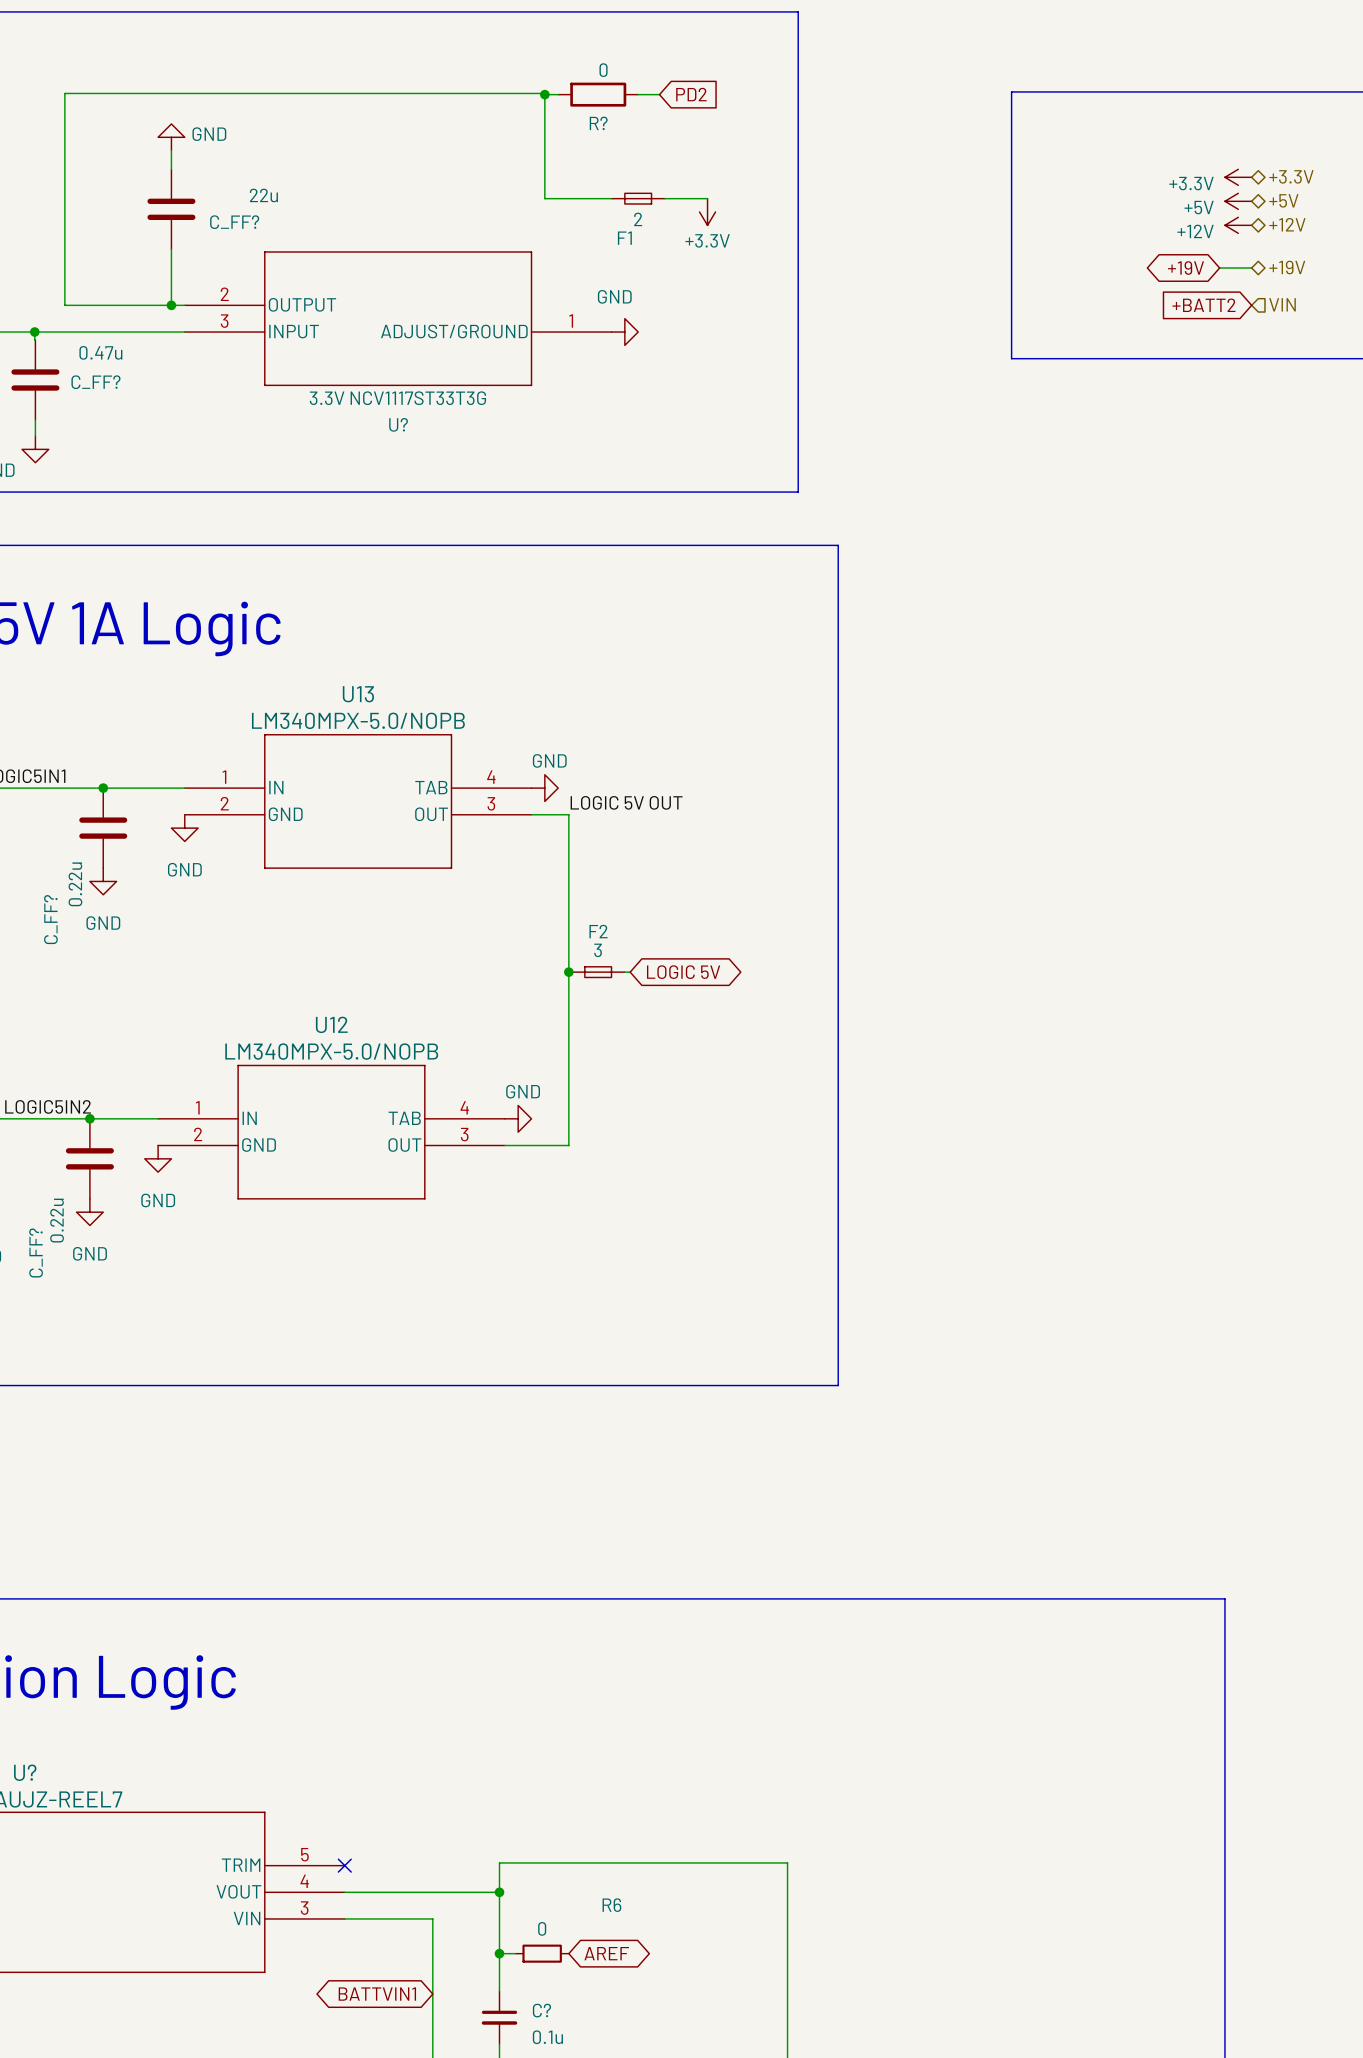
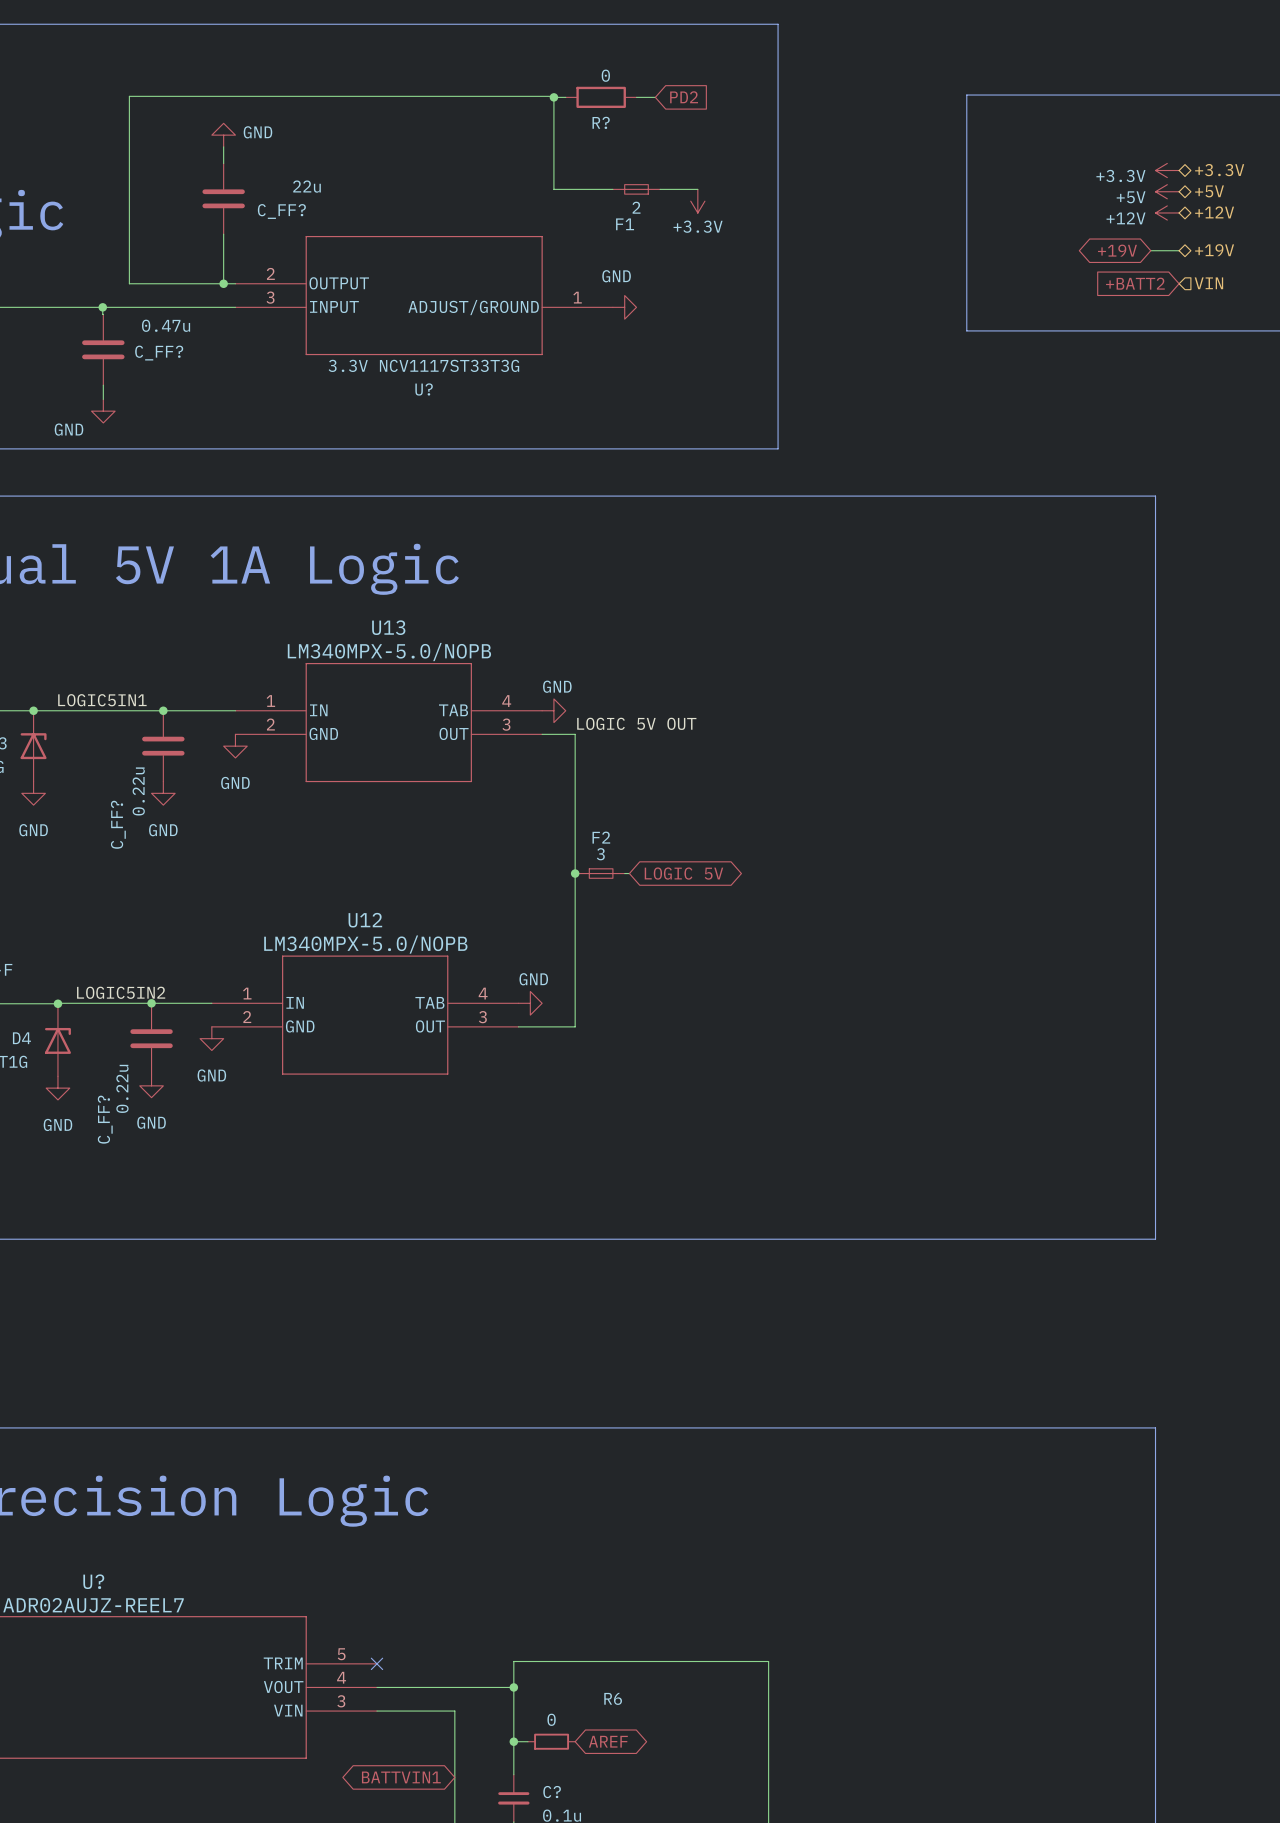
line: (838, 545) (838, 1385) -> (813, 496) (1155, 496) (1155, 1239) (813, 1239)

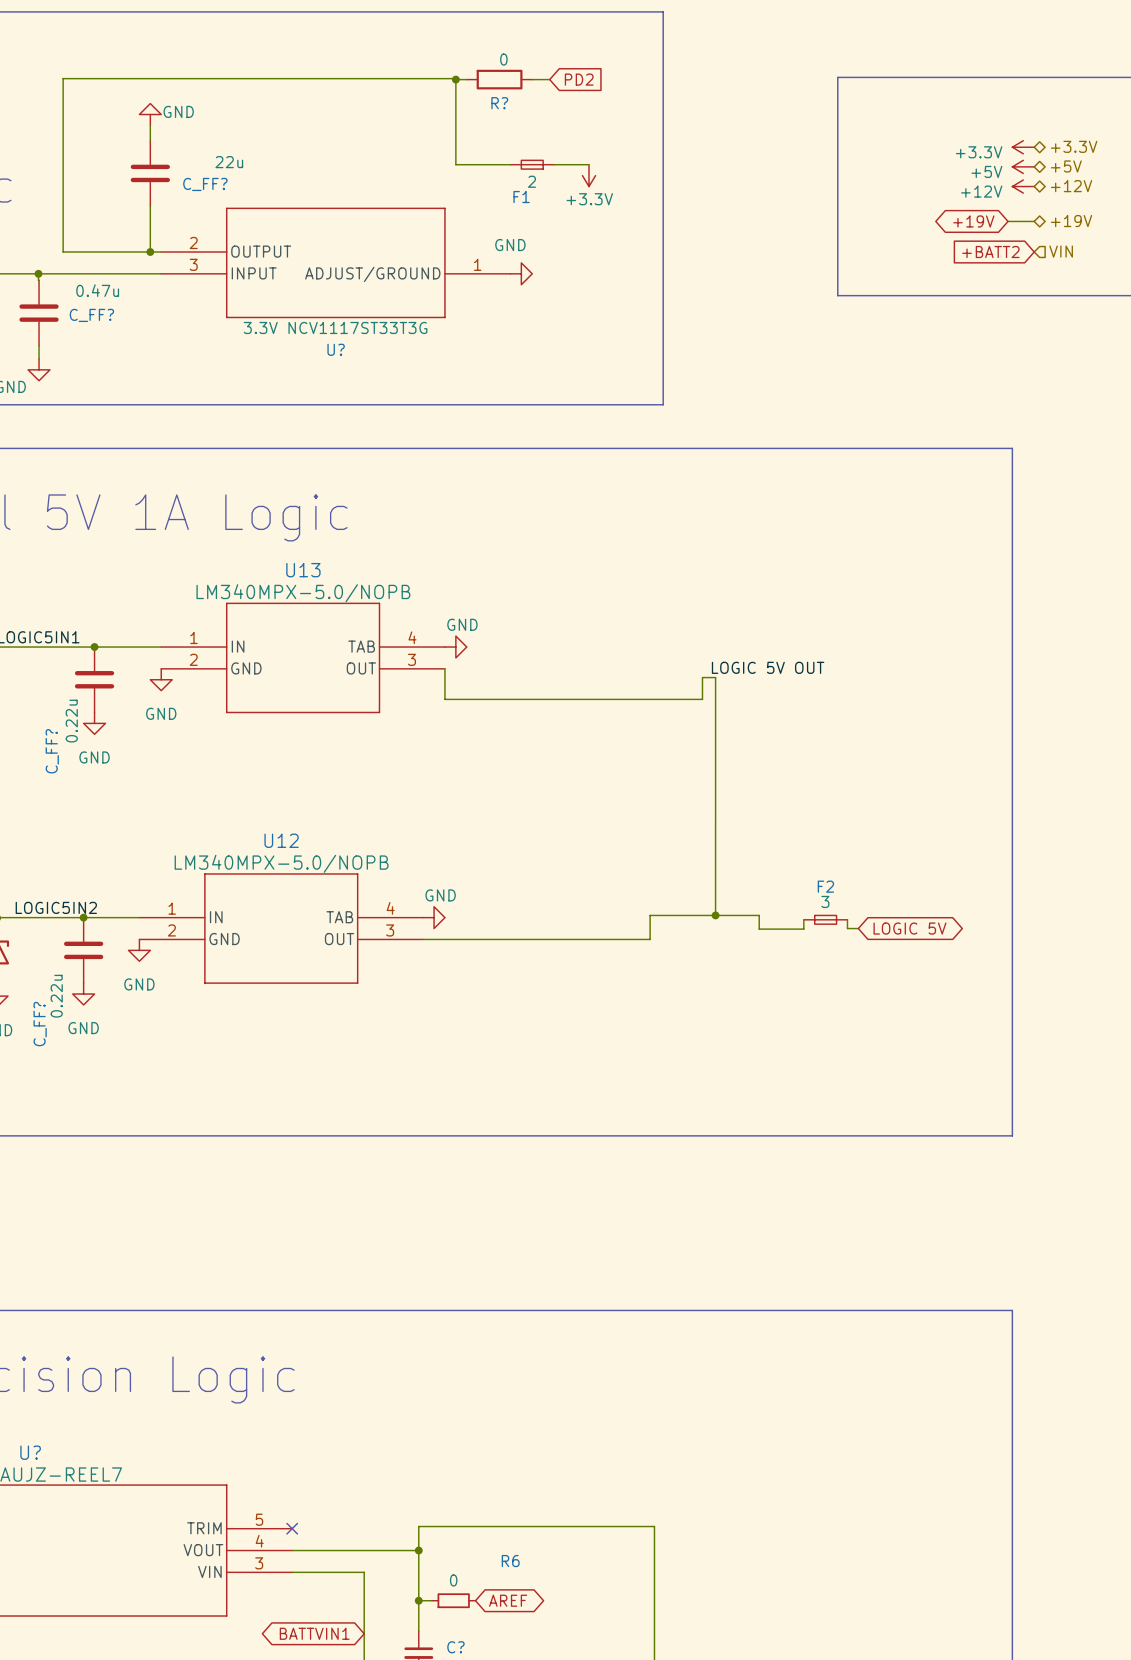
label: LOGIC 5V OUT (636, 723) -> none
label: none -> LOGIC 5V OUT (768, 667)
wire: (542, 734) (575, 734) (575, 1026) -> (444, 668) (444, 699) (702, 699) (702, 677) (715, 677) (715, 915)
junction: (575, 873) -> none
F2 position: (601, 873) -> (825, 919)
wire: (624, 873) (629, 873) -> none
global label: LOGIC 5V (683, 873) -> none
junction: none -> (715, 915)
wire: none -> (803, 919) (803, 929) (759, 929) (759, 915) (650, 915) (650, 939) (475, 939)
wire: none -> (847, 919) (847, 928) (858, 928)
global label: none -> LOGIC 5V (909, 928)

